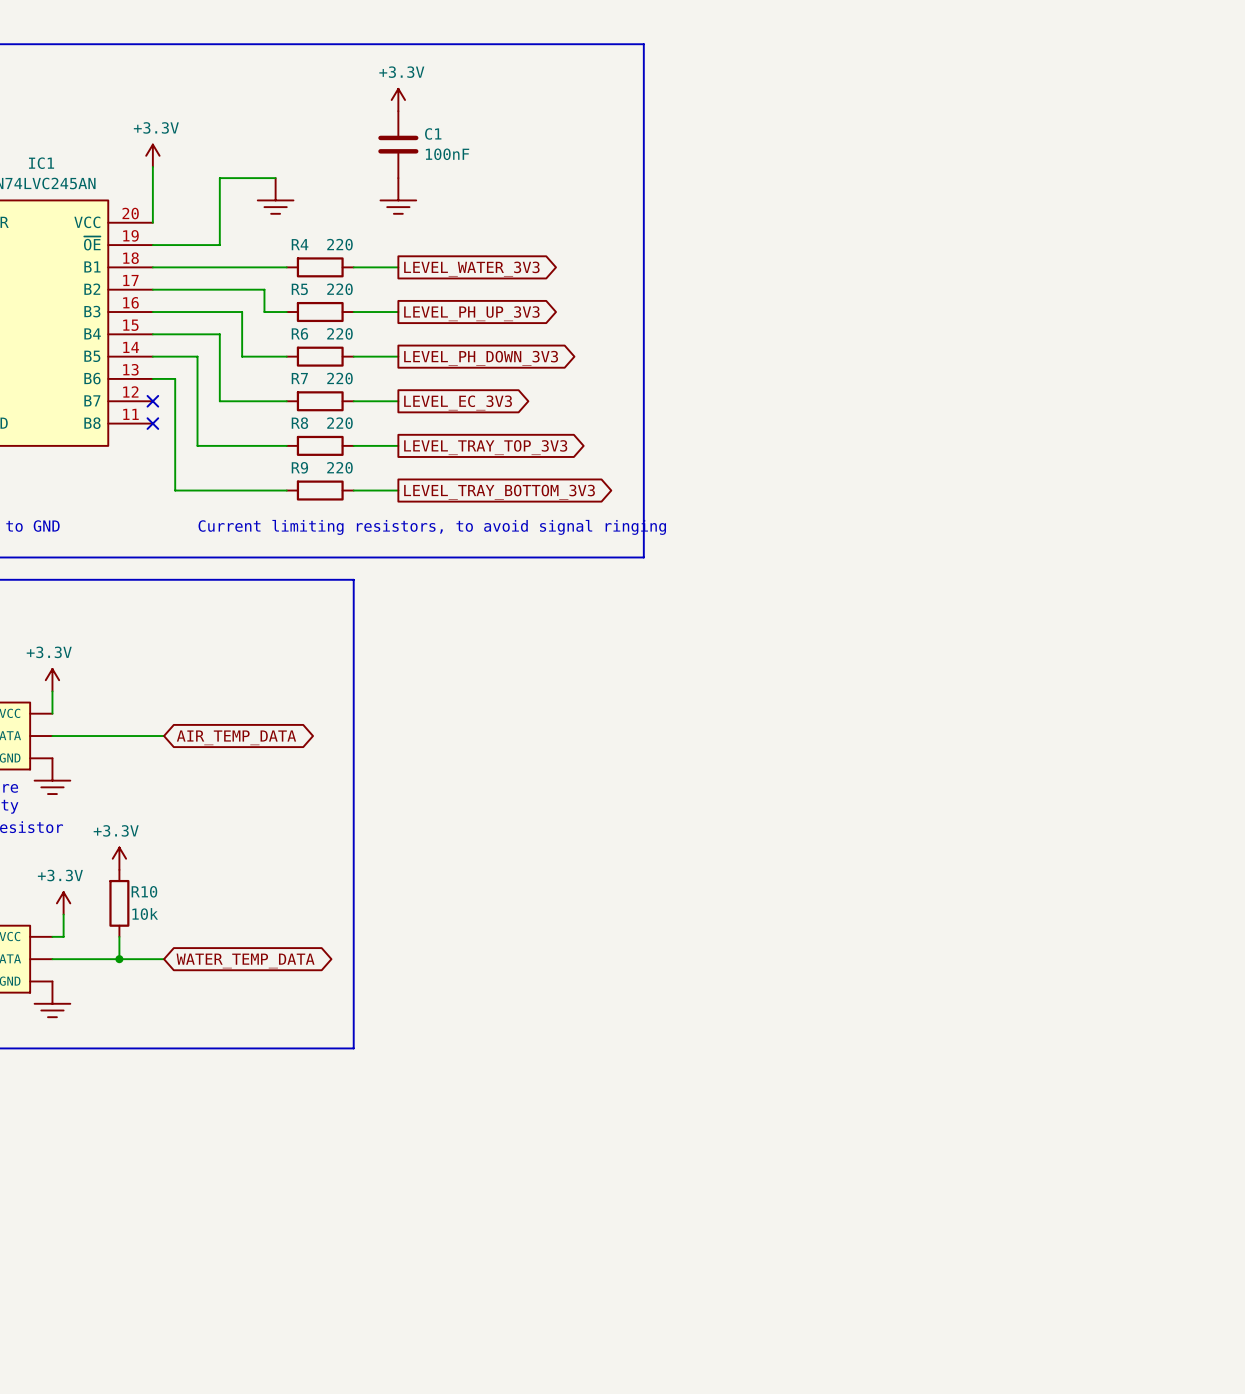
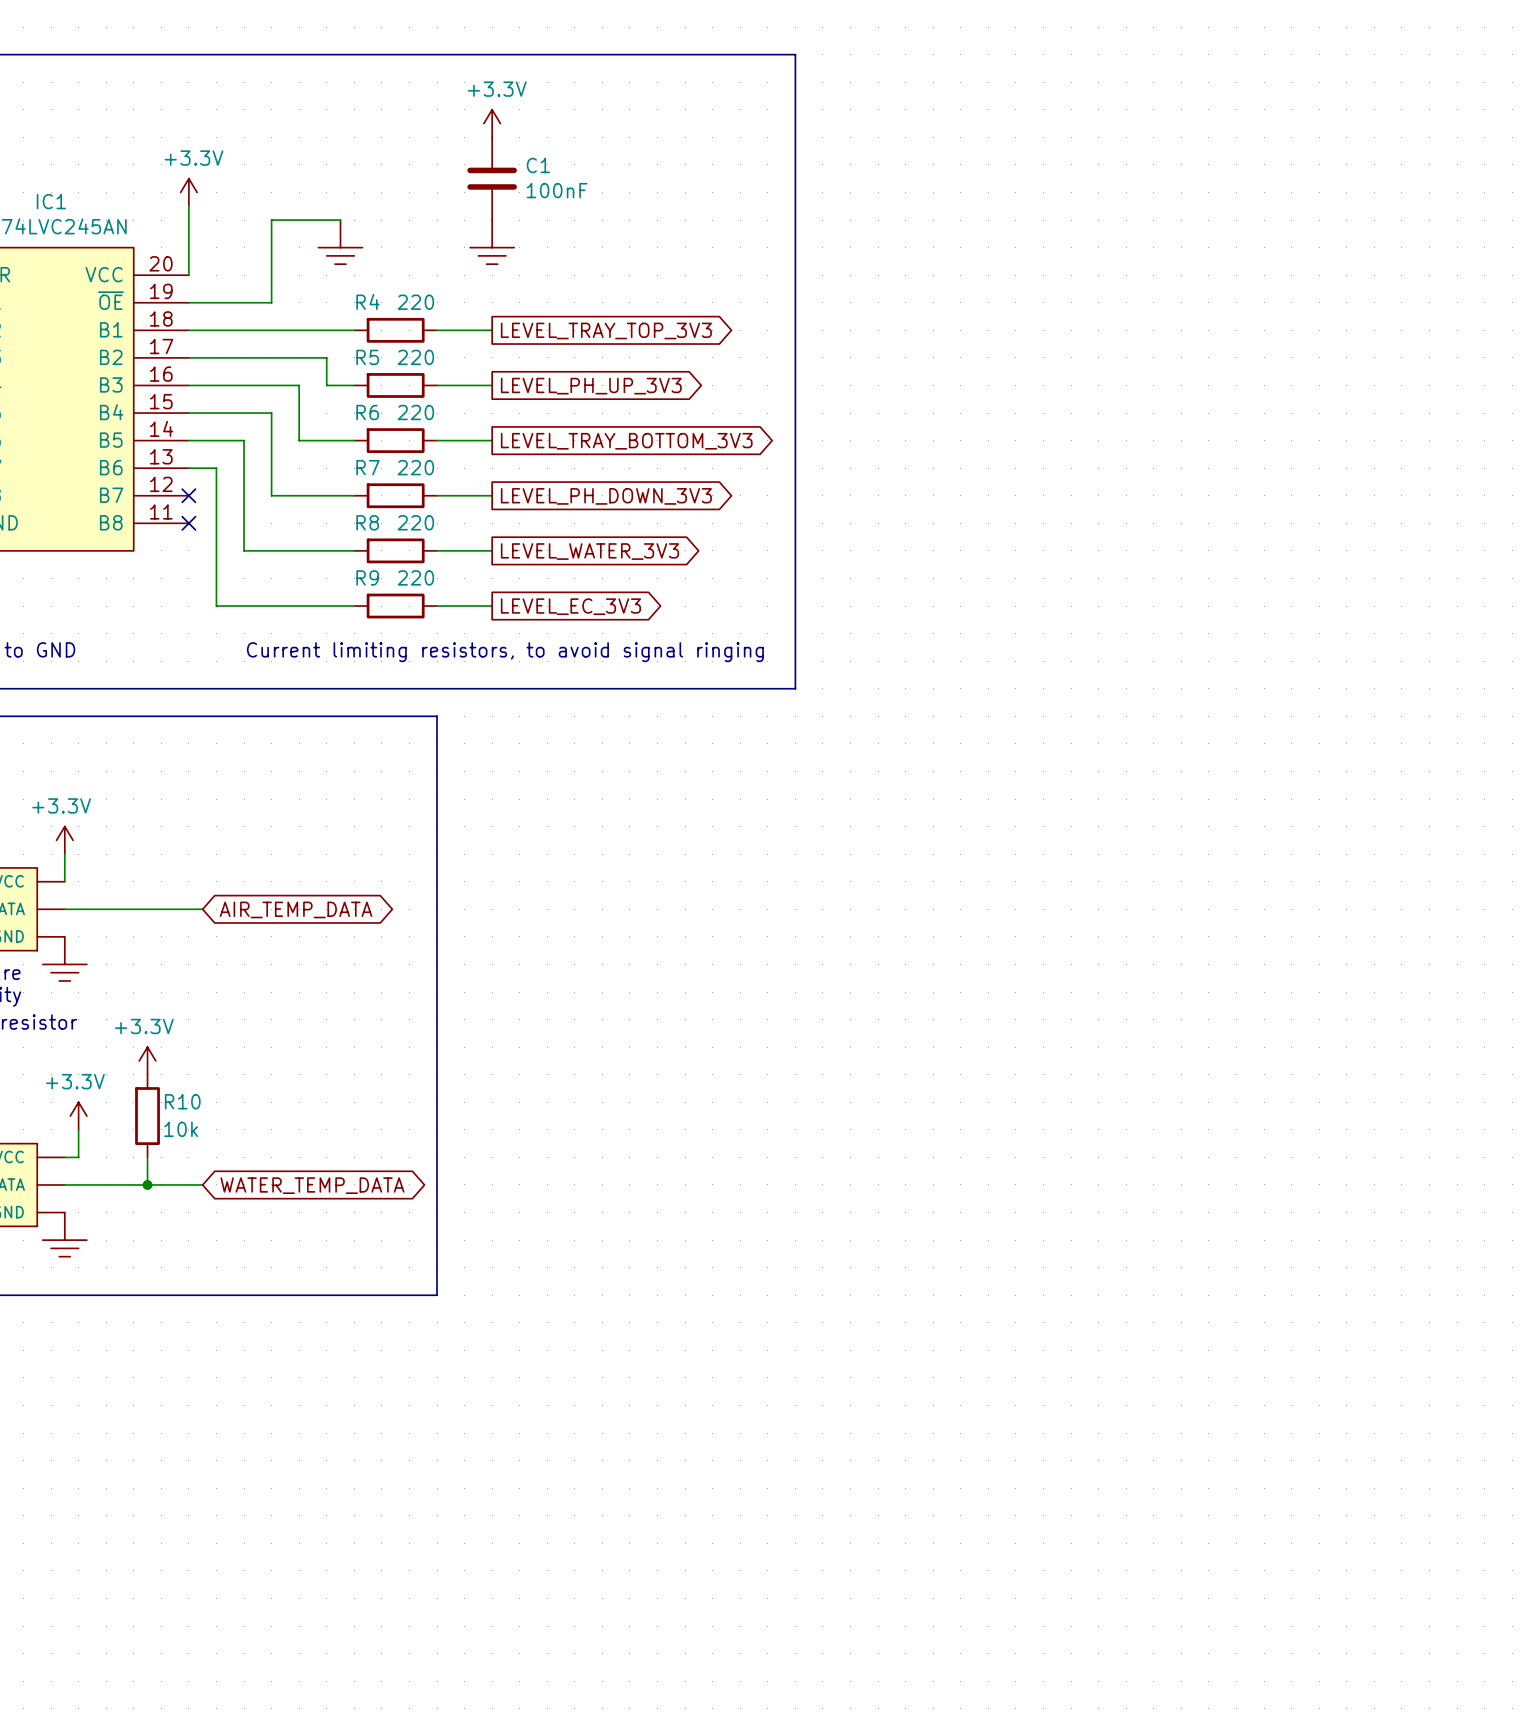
global label: LEVEL_WATER_3V3 (471, 269) -> LEVEL_TRAY_TOP_3V3 (606, 330)
global label: LEVEL_PH_DOWN_3V3 (481, 358) -> LEVEL_TRAY_BOTTOM_3V3 (626, 441)
global label: LEVEL_EC_3V3 (458, 402) -> LEVEL_PH_DOWN_3V3 (606, 496)
global label: LEVEL_TRAY_TOP_3V3 (485, 447) -> LEVEL_WATER_3V3 (589, 551)
global label: LEVEL_TRAY_BOTTOM_3V3 (499, 492) -> LEVEL_EC_3V3 (570, 606)

